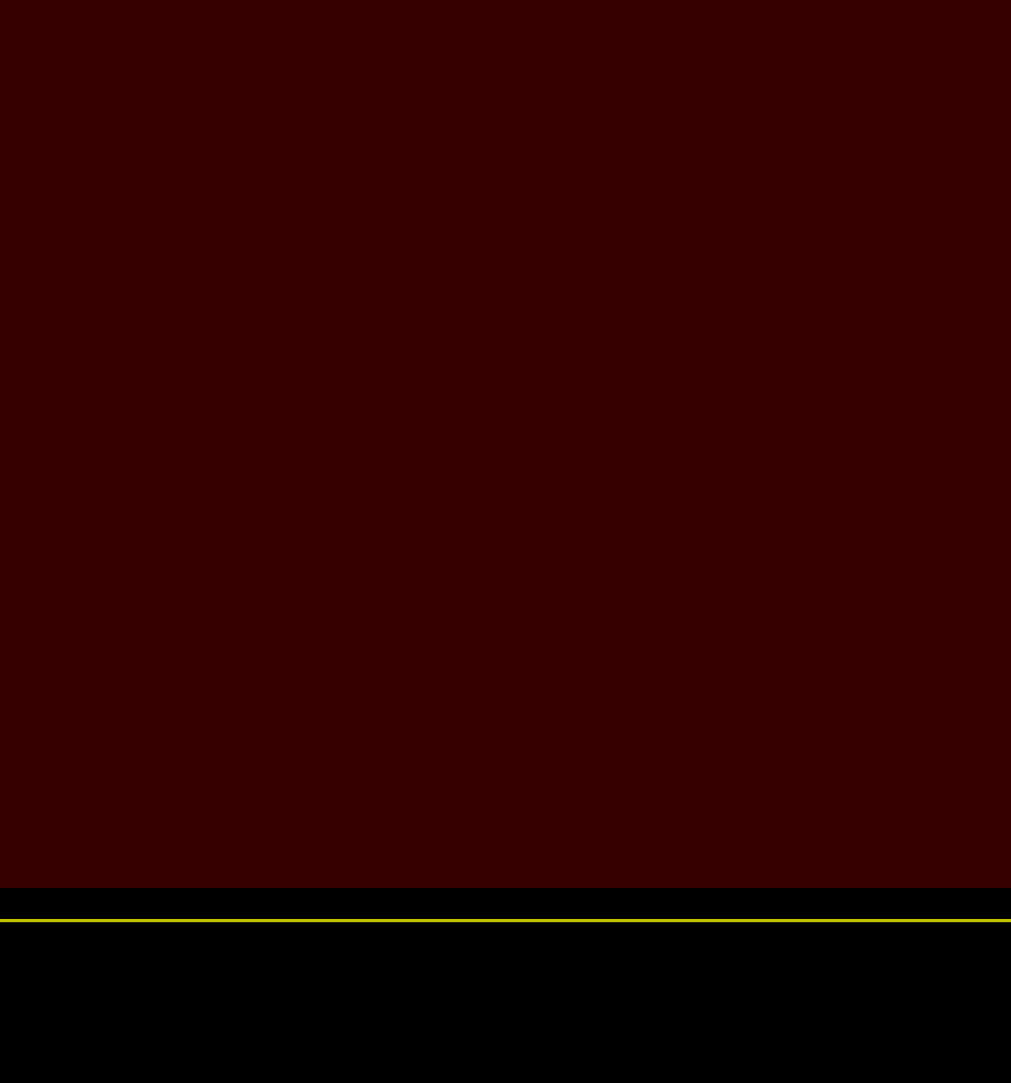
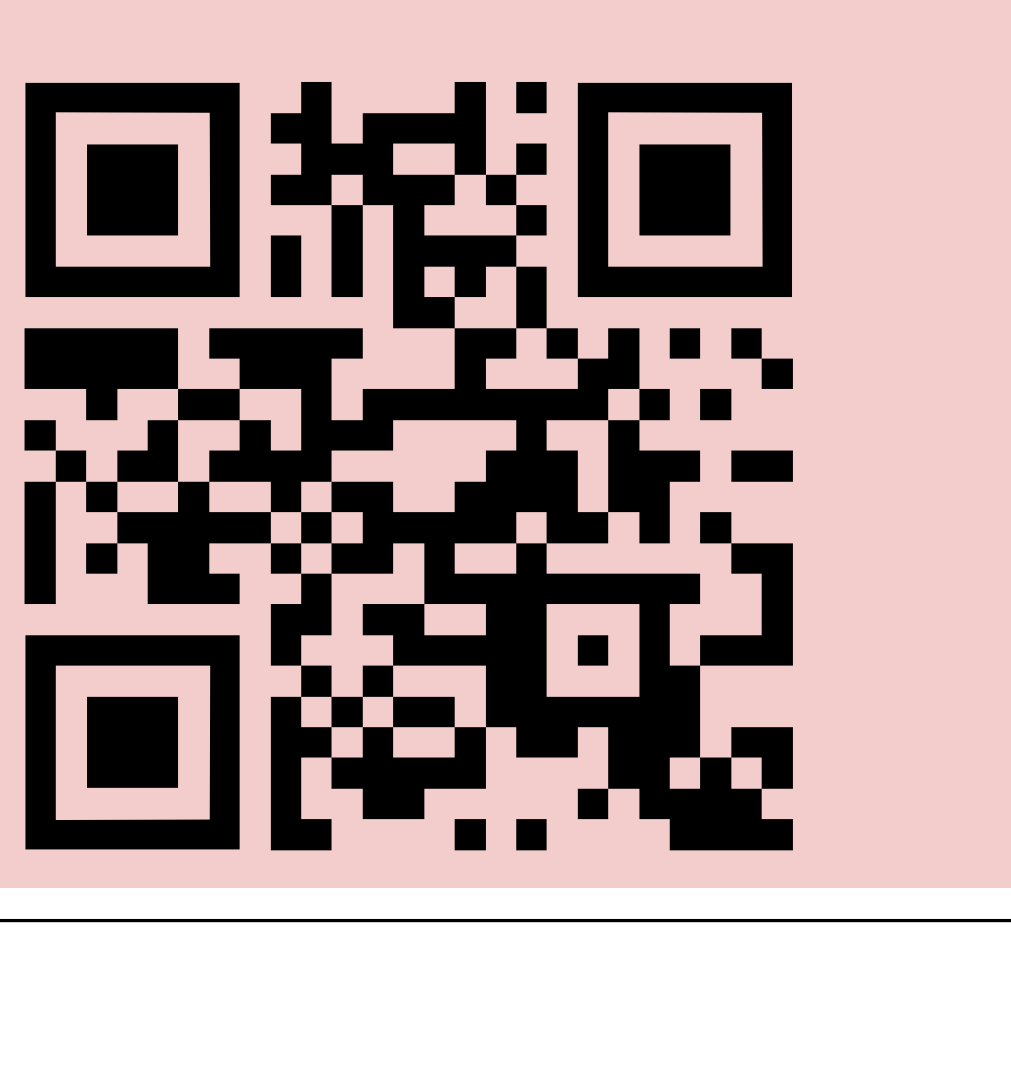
drawing: none -> [24, 81, 793, 851]

